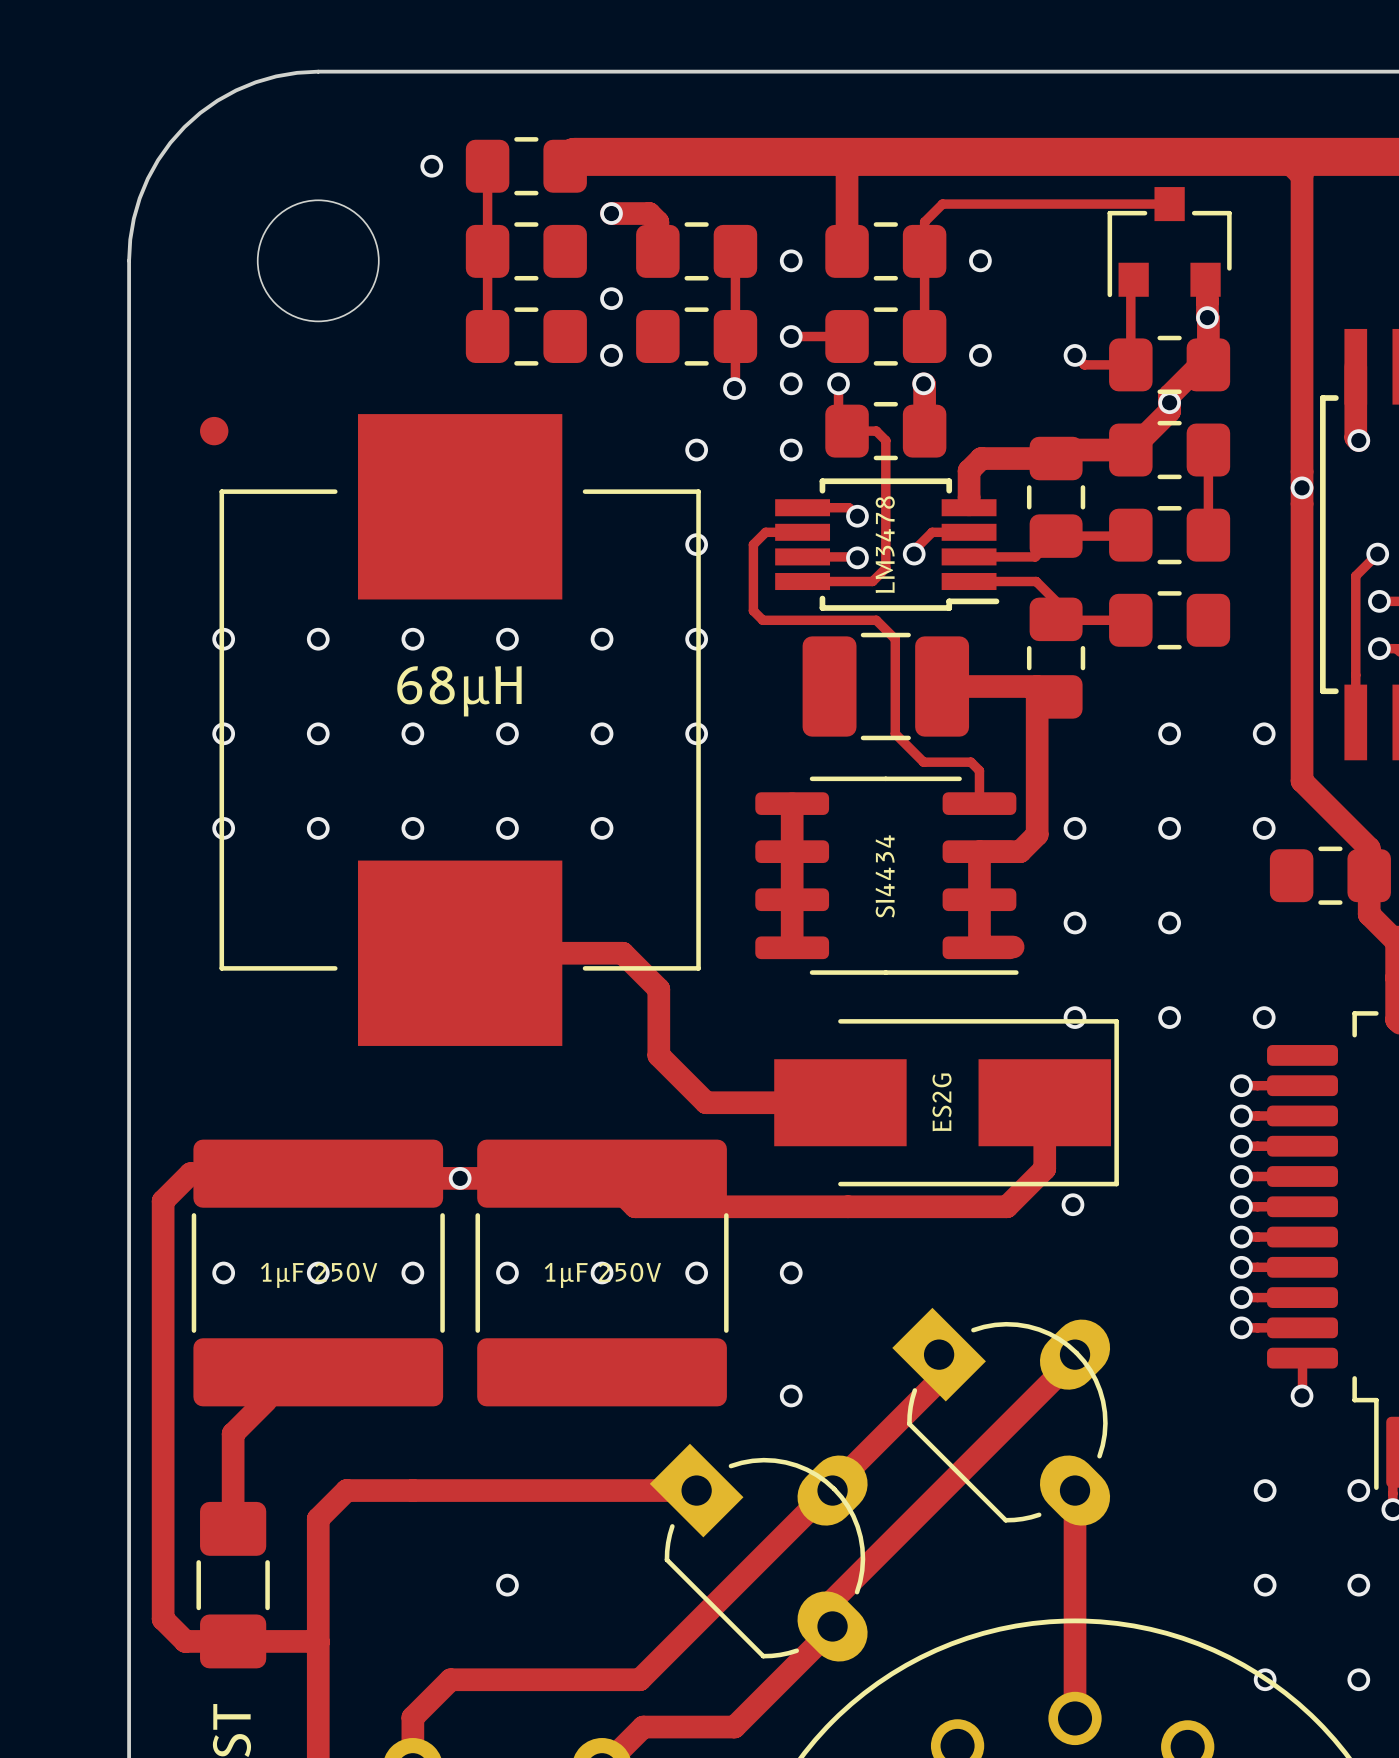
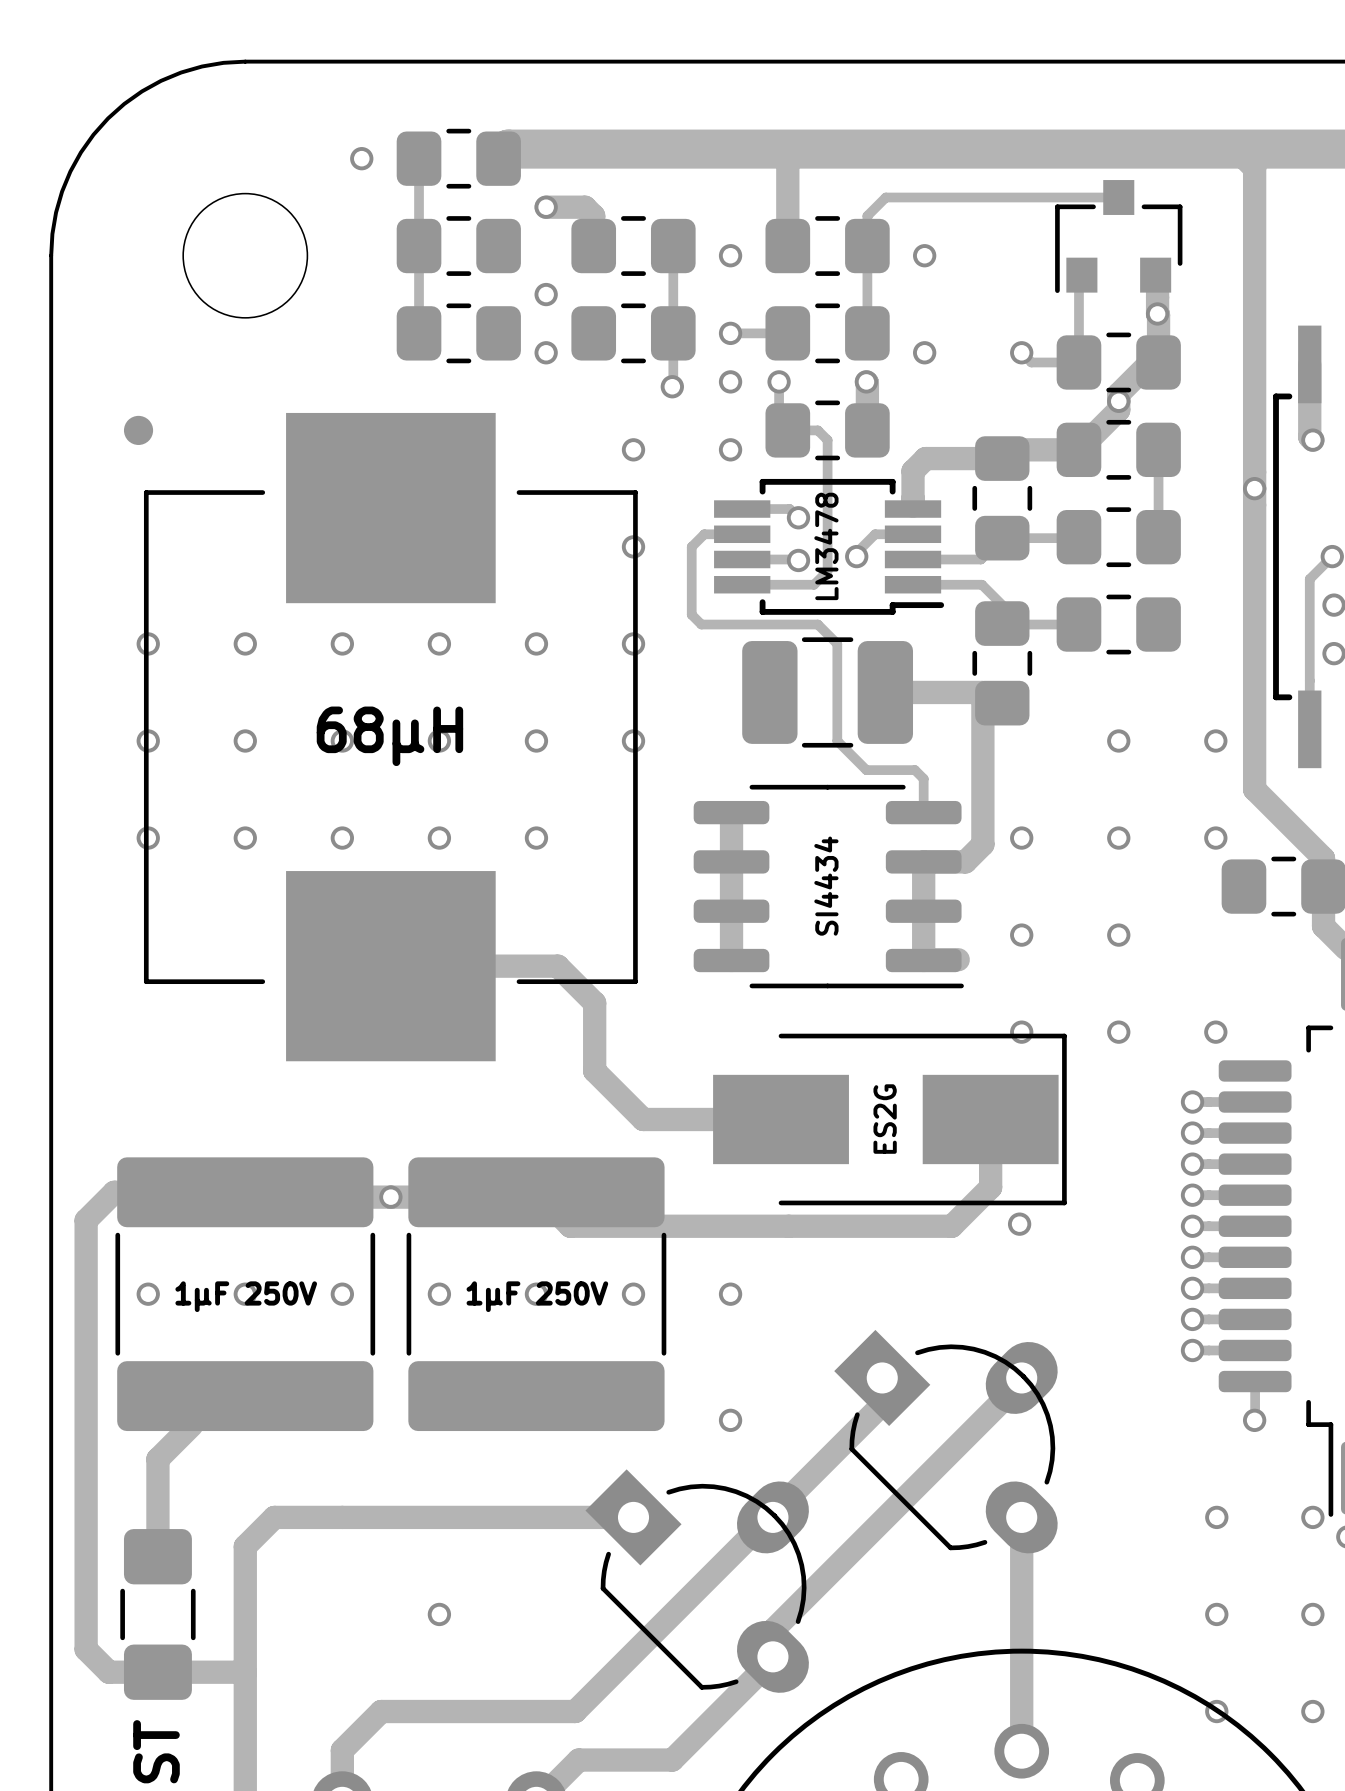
68µH name position: 68µH (459, 691) -> 68µH (389, 736)

